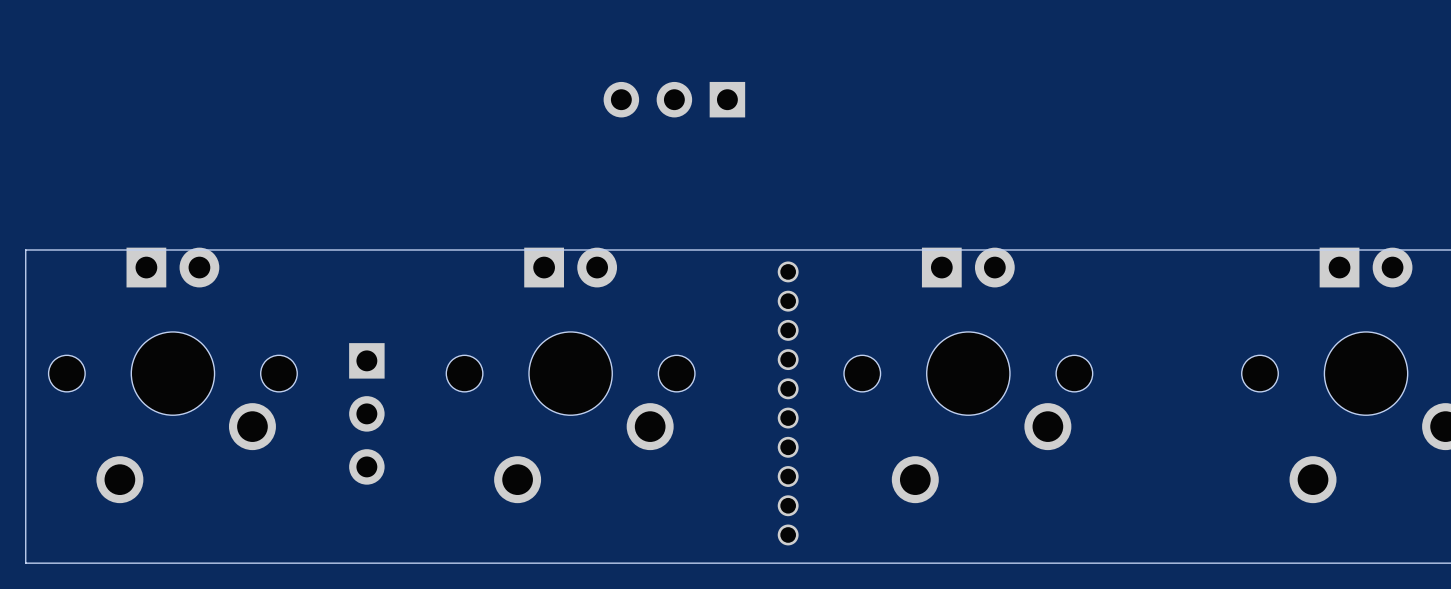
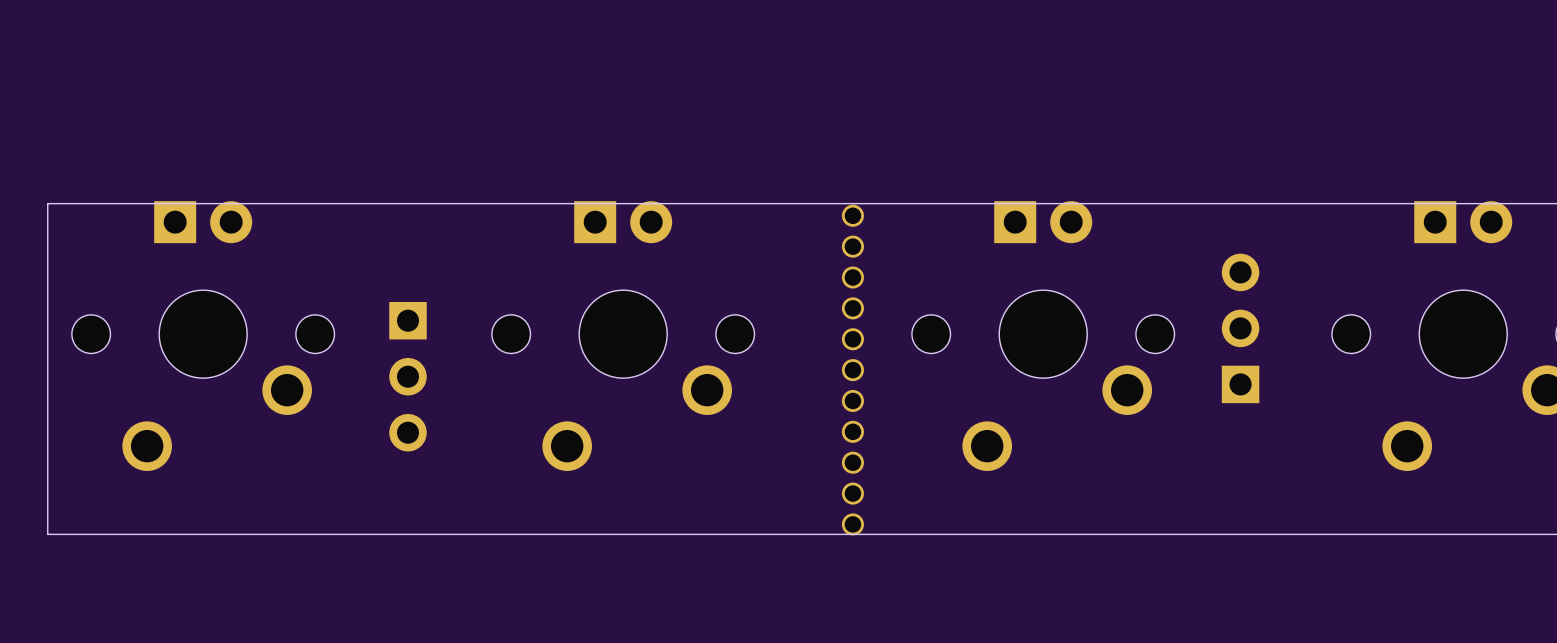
part: (674, 99) -> none
part footprint: [777, 261, 799, 546] -> [841, 204, 864, 536]
part: none -> (1240, 328)

